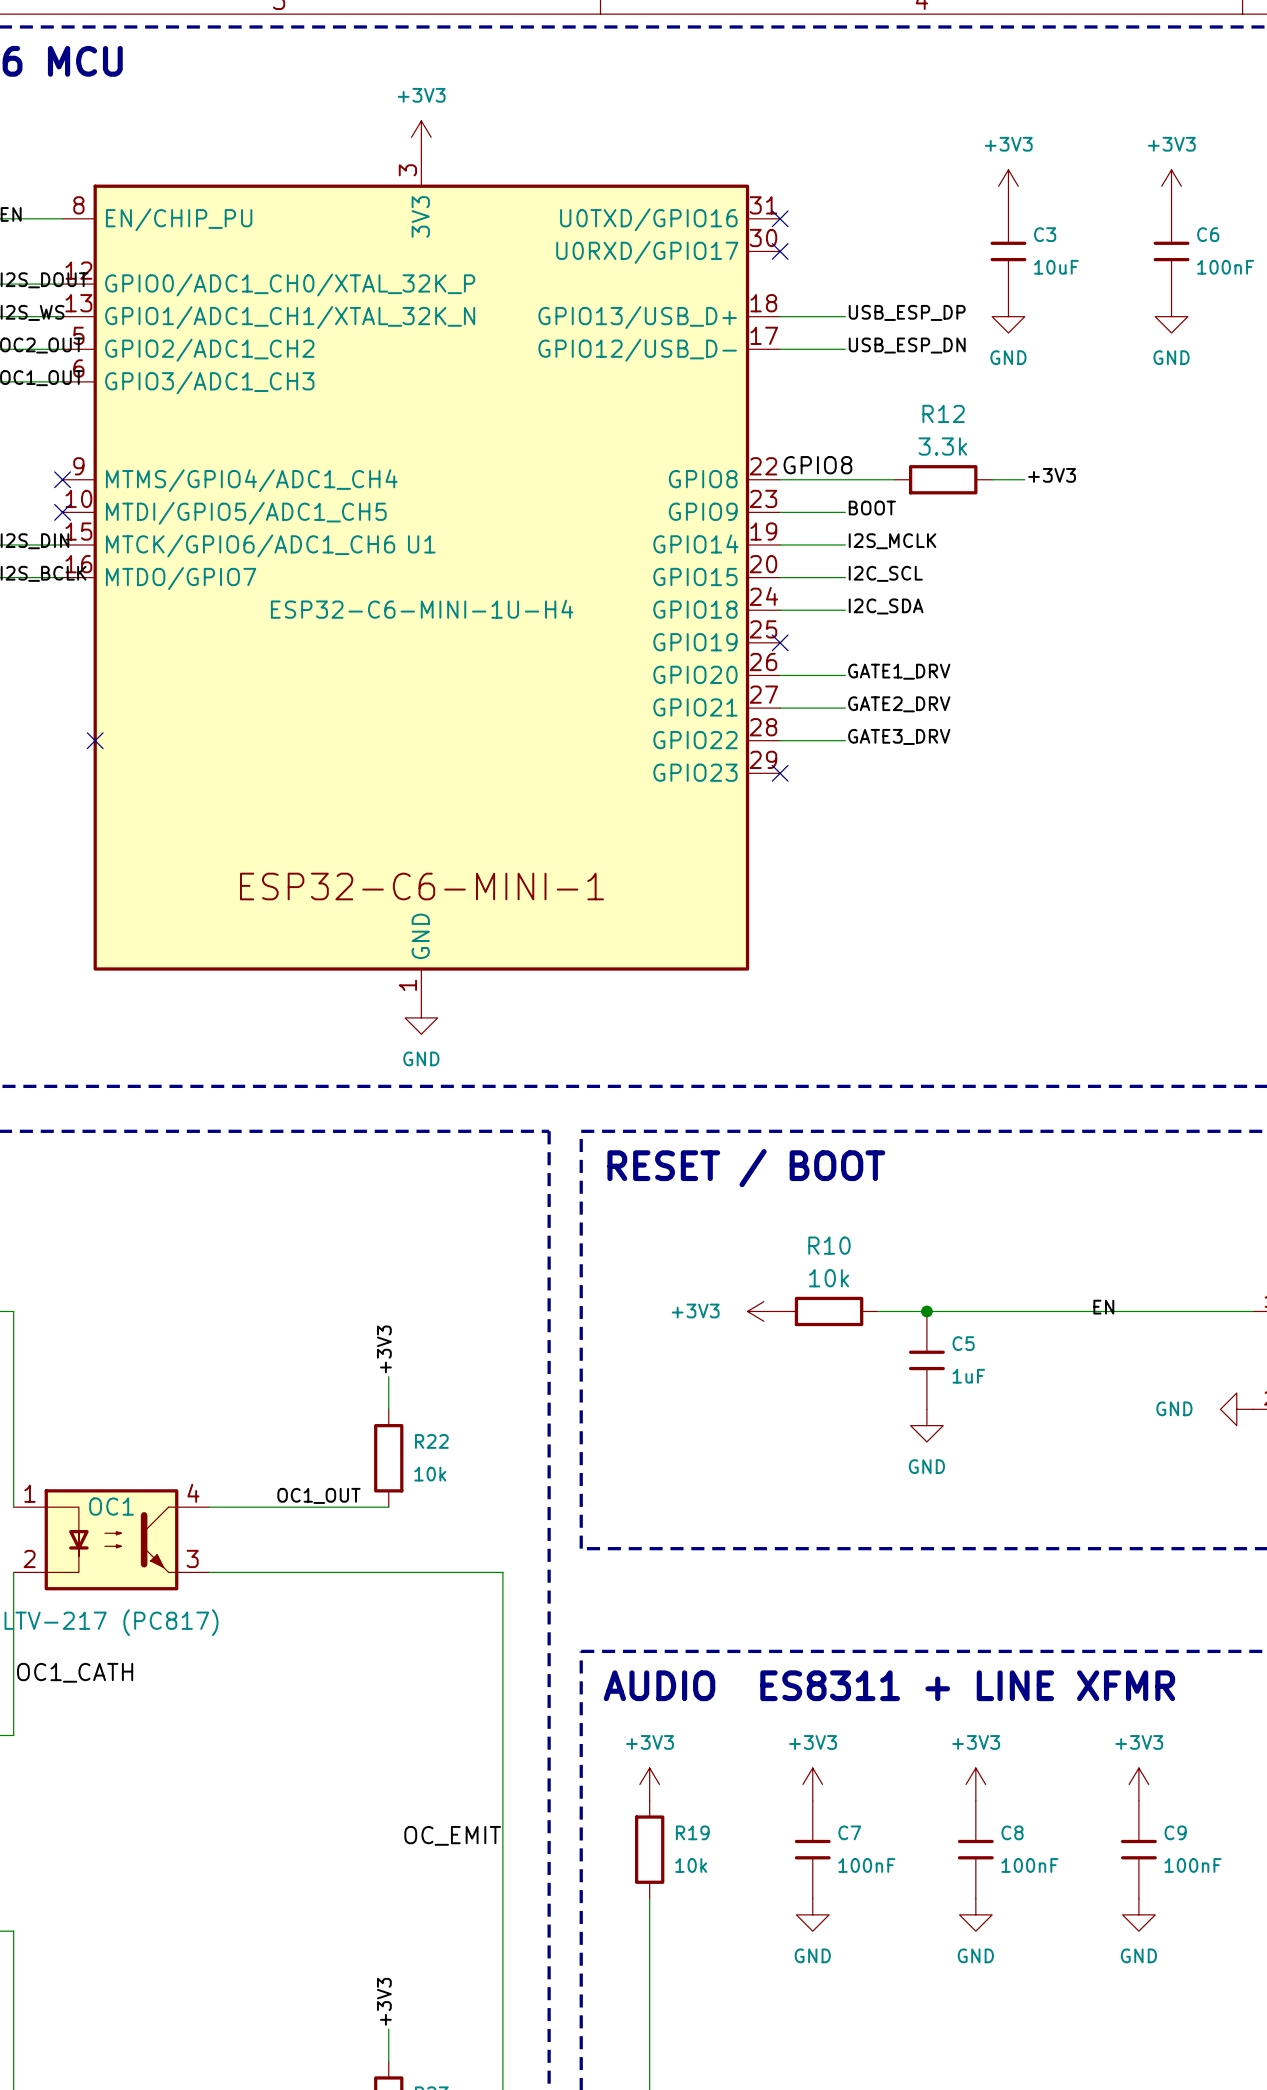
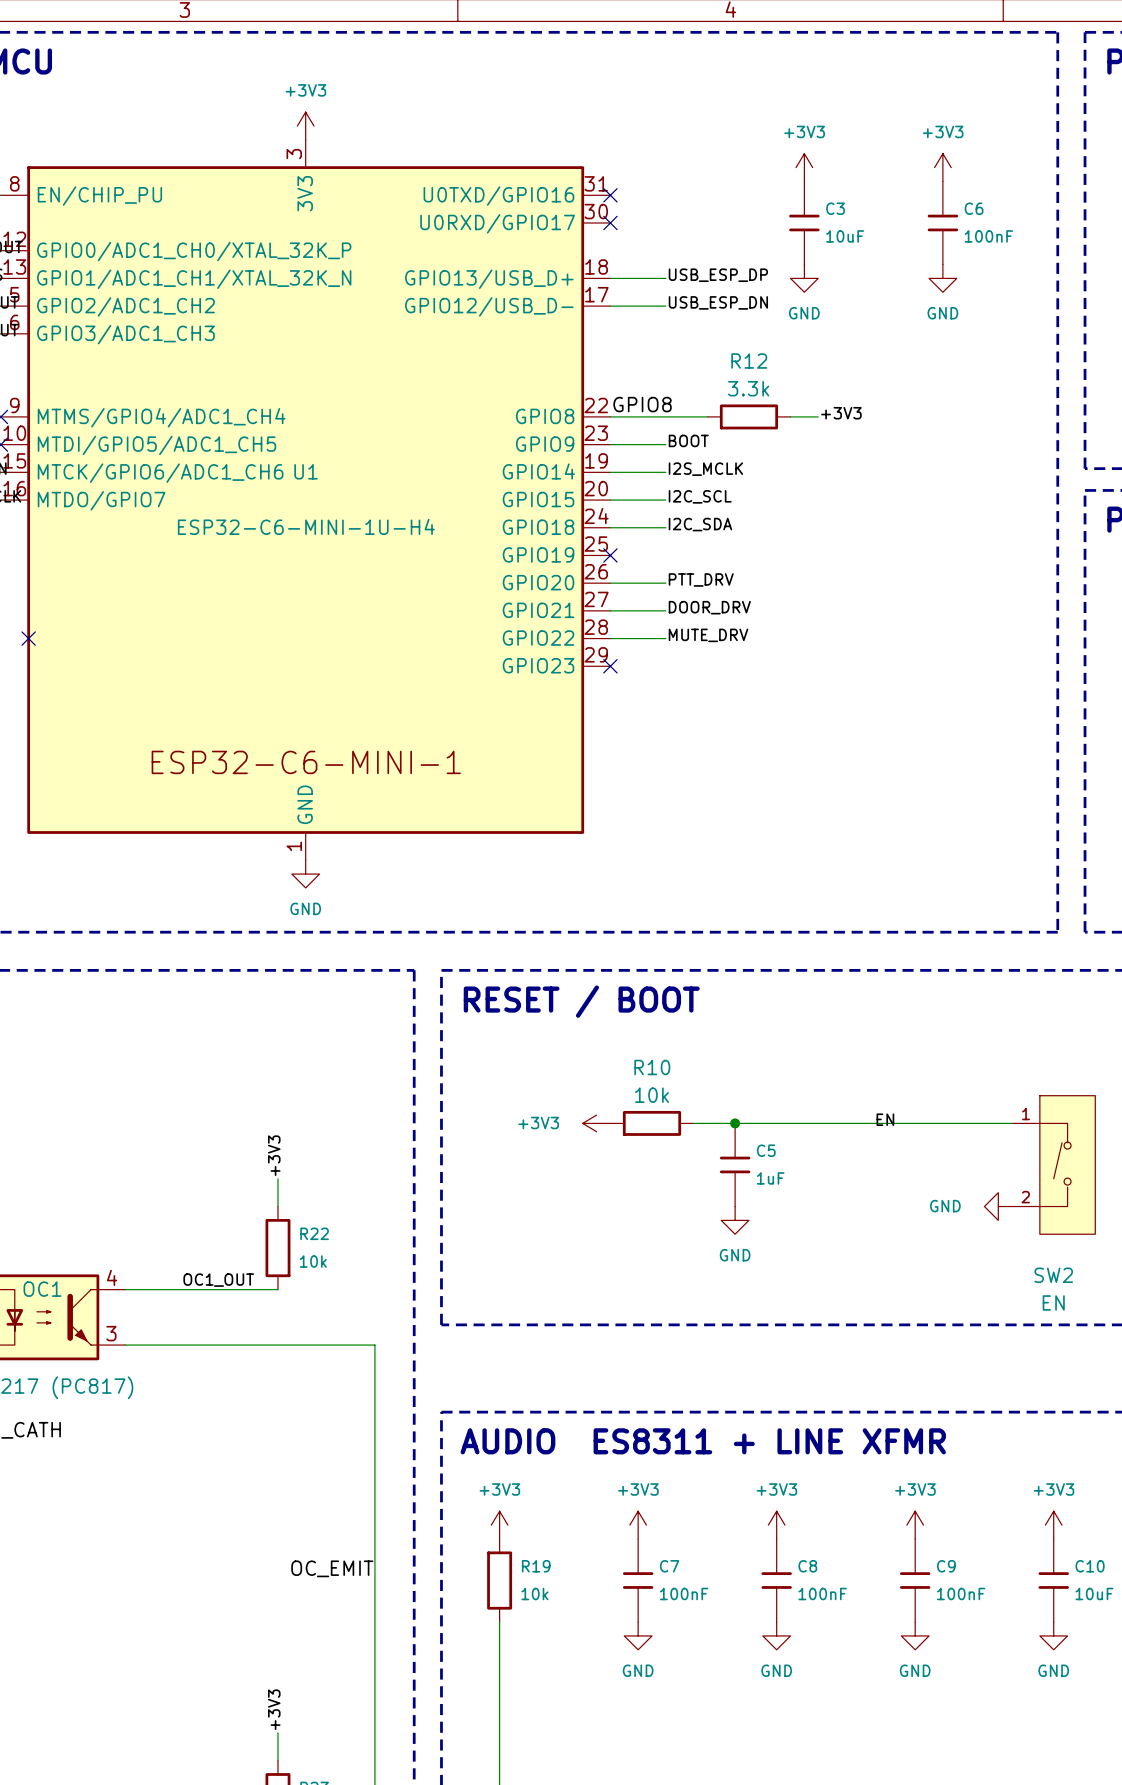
label: GATE1_DRV (899, 671) -> PTT_DRV (701, 579)
label: GATE2_DRV (899, 704) -> DOOR_DRV (709, 607)
label: GATE3_DRV (899, 736) -> MUTE_DRV (708, 635)

